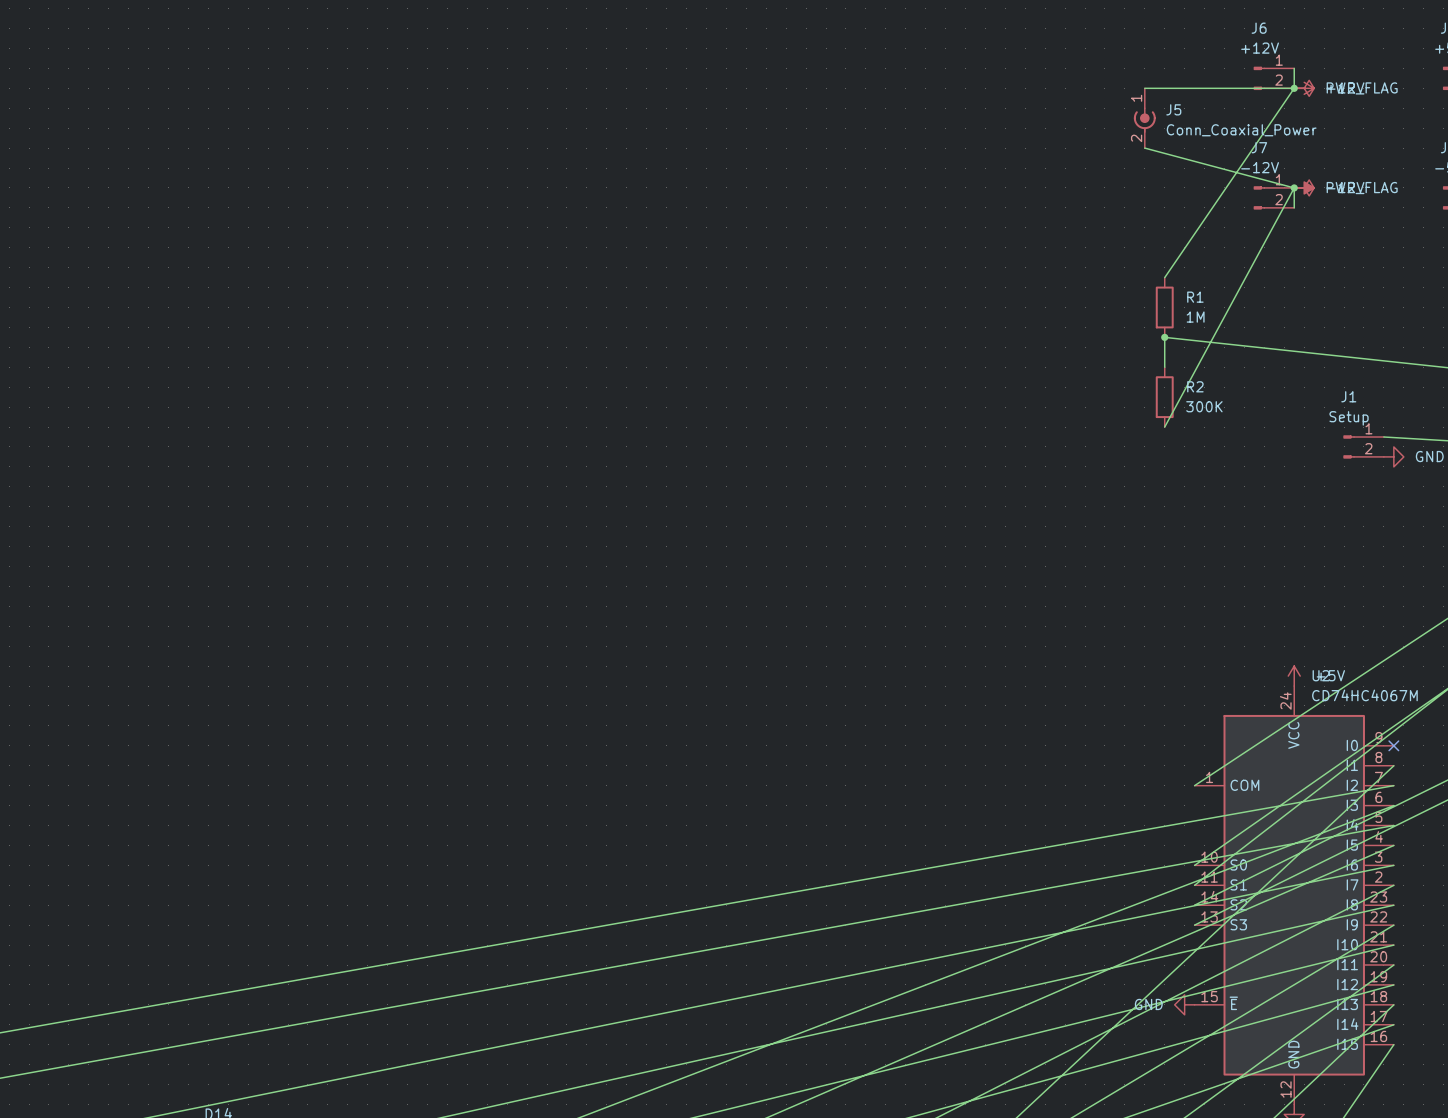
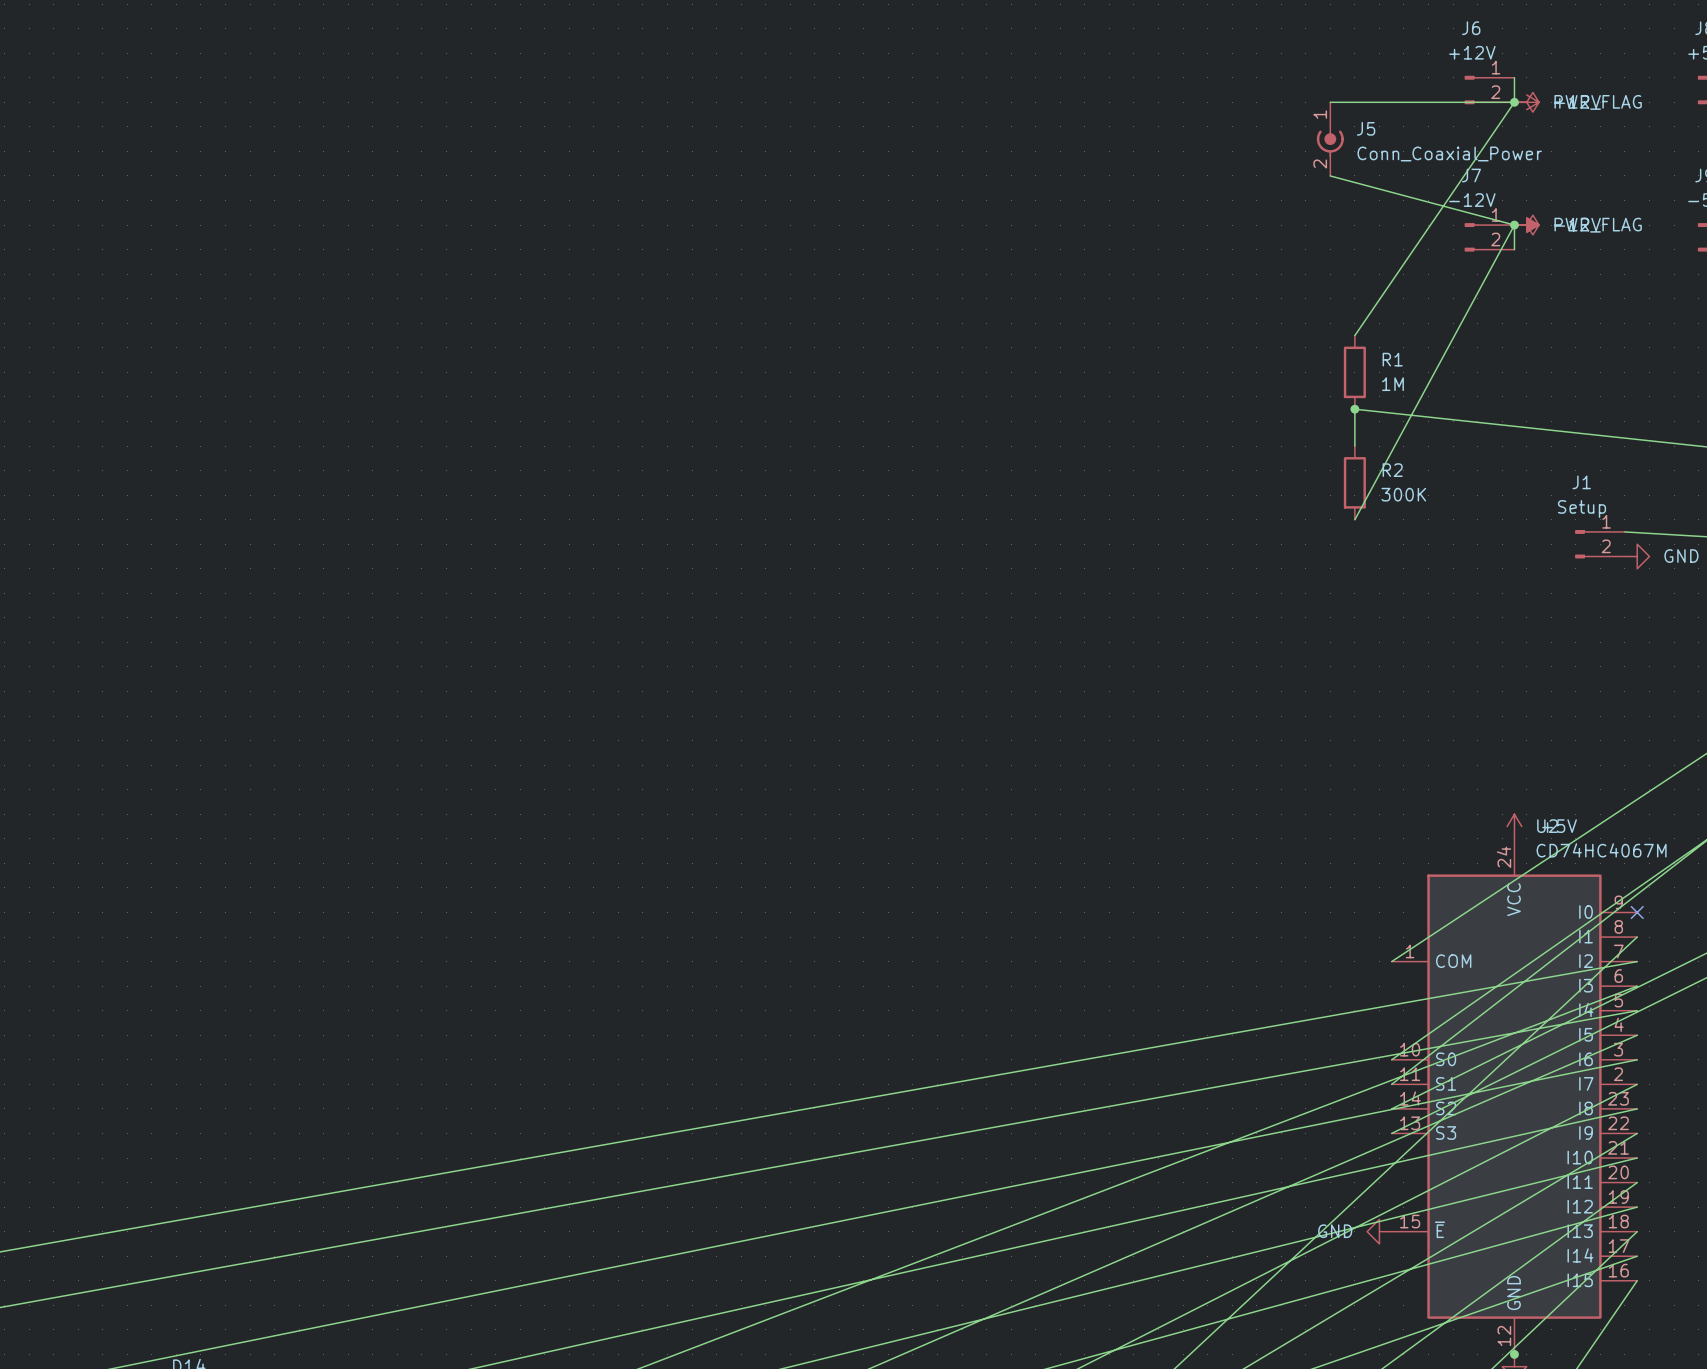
junction: none -> (1514, 1354)

